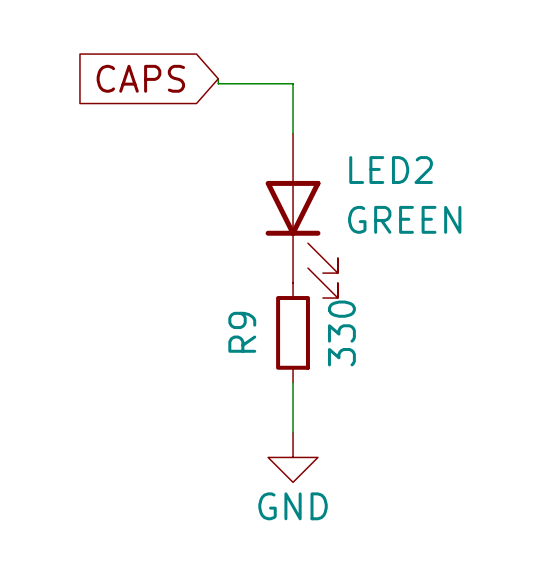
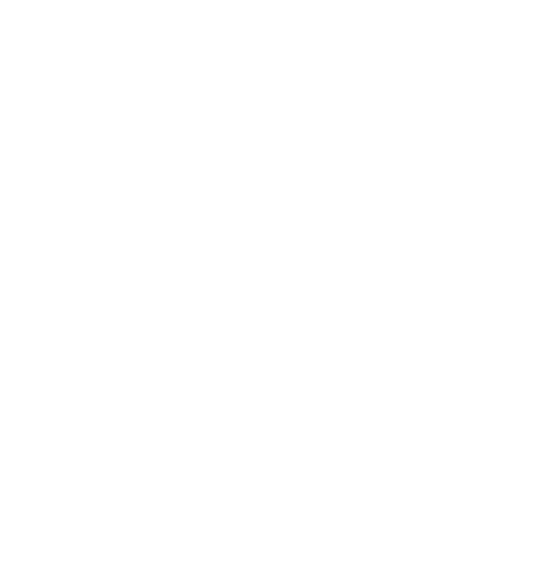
global label: CAPS (140, 78) -> none
wire: (218, 78) (218, 83) (293, 83) (293, 133) -> none
LED2: GREEN (301, 215) -> none
R9: 330 (293, 332) -> none
wire: (293, 382) (293, 432) -> none
power symbol: GND (293, 457) -> none

